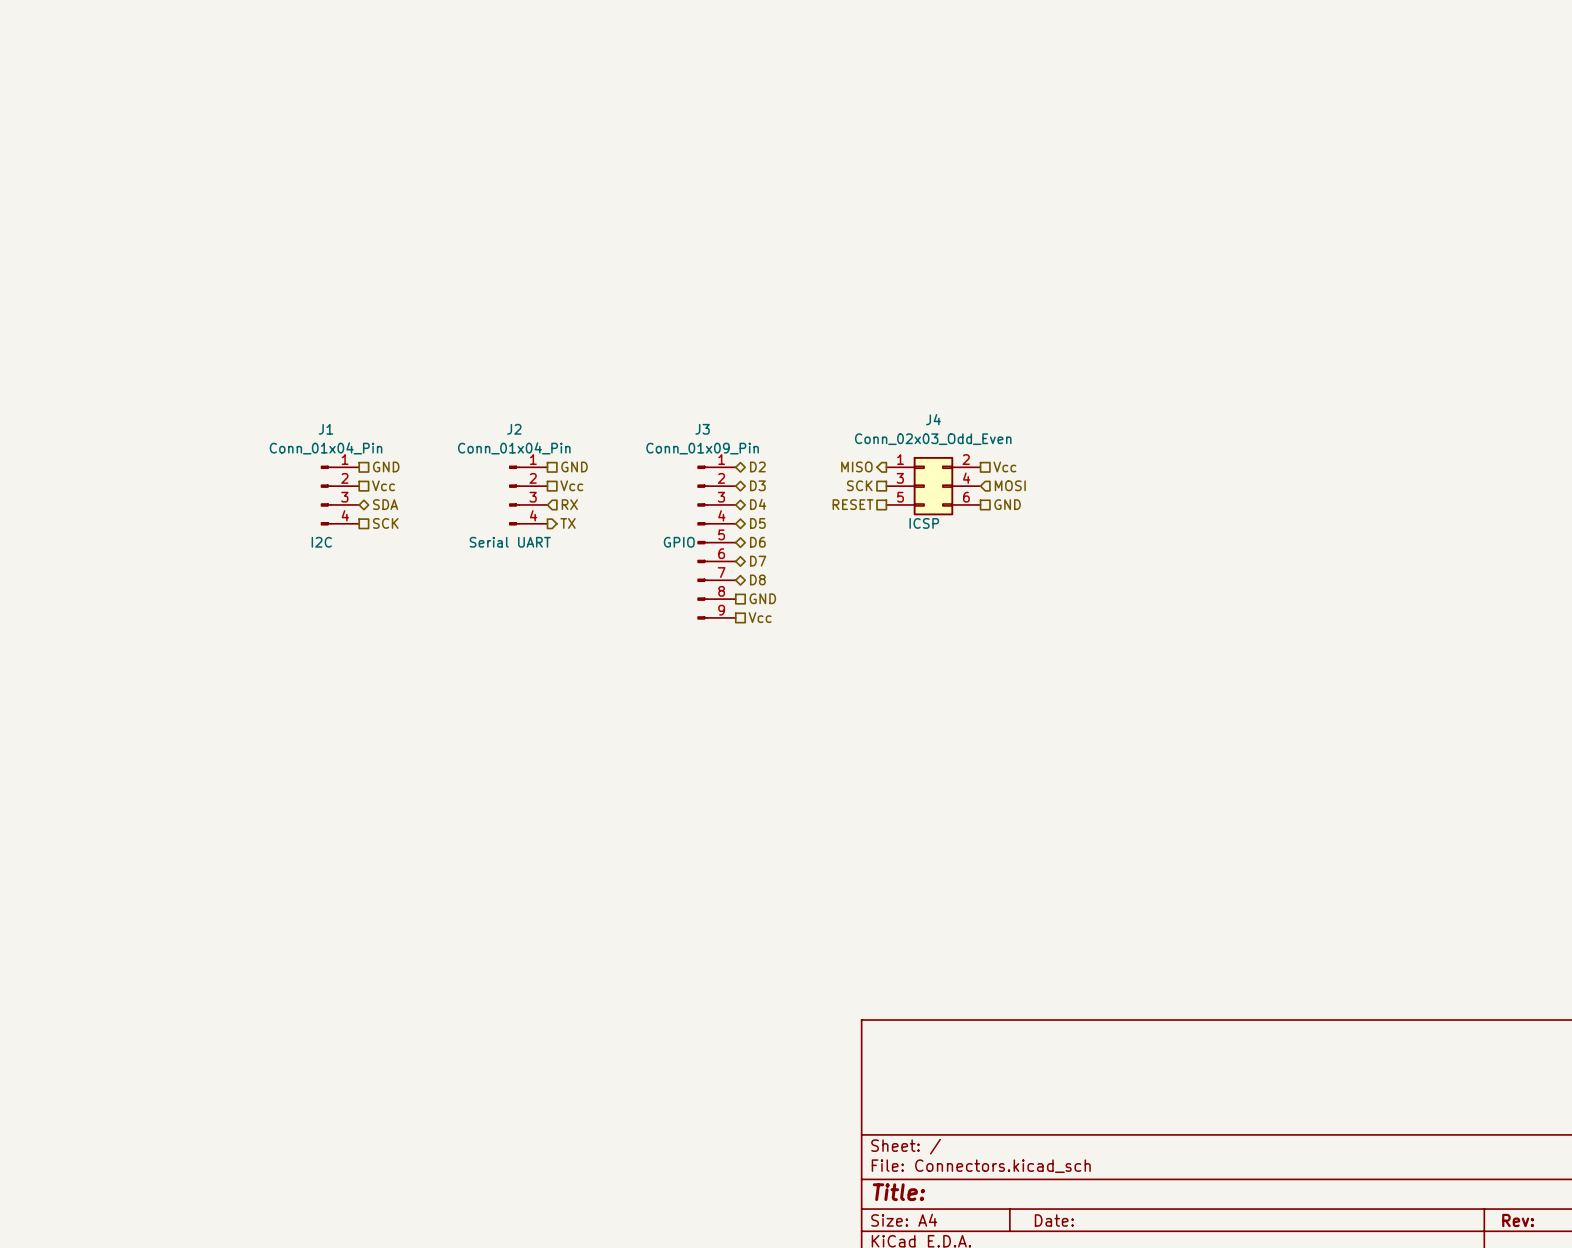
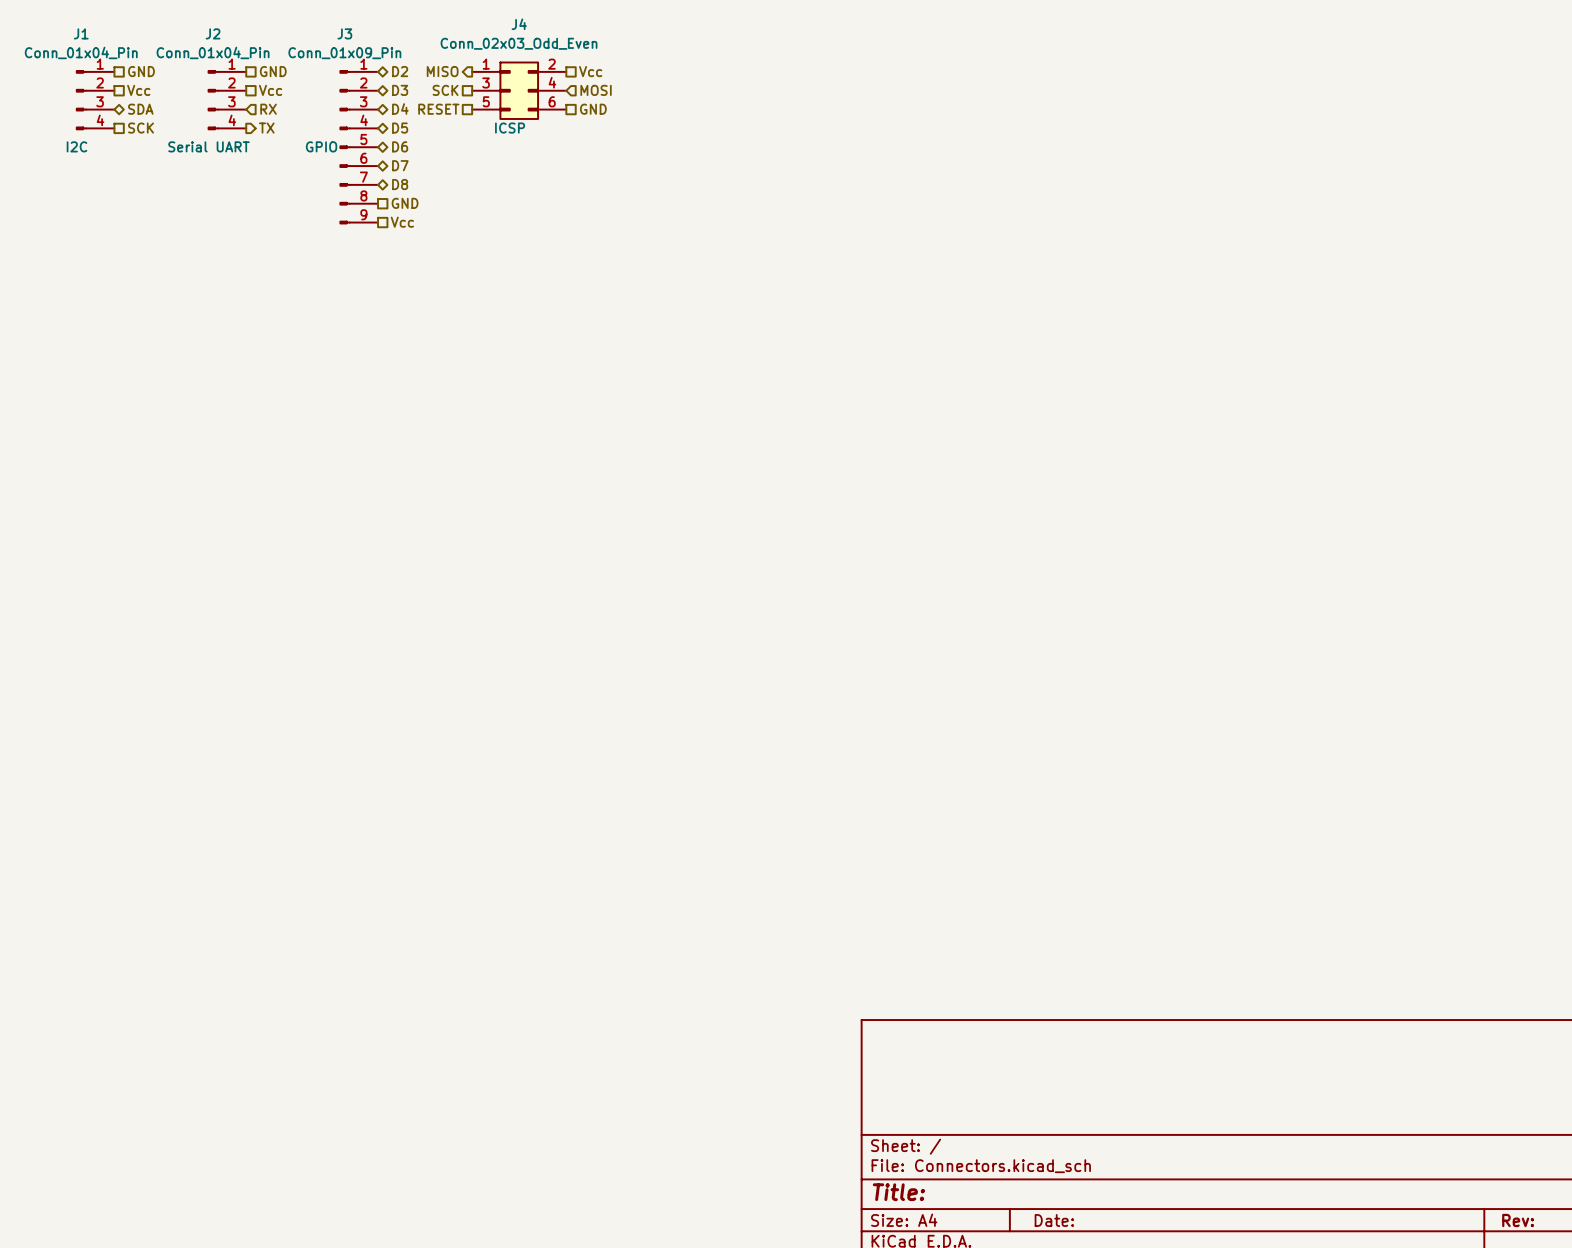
hierarchical label: none -> GND (141, 71)
hierarchical label: none -> GND (273, 71)
hierarchical label: none -> D2 (400, 71)
hierarchical label: none -> MISO (442, 71)
hierarchical label: none -> Vcc (590, 71)
hierarchical label: none -> Vcc (138, 90)
hierarchical label: none -> Vcc (270, 90)
hierarchical label: none -> D3 (400, 90)
hierarchical label: none -> SCK (445, 90)
hierarchical label: none -> MOSI (596, 90)
hierarchical label: none -> D4 (400, 108)
hierarchical label: none -> SDA (140, 109)
hierarchical label: none -> RX (268, 109)
hierarchical label: none -> RESET (438, 109)
hierarchical label: none -> GND (593, 109)
hierarchical label: none -> SCK (141, 128)
hierarchical label: none -> TX (266, 128)
hierarchical label: none -> D5 (400, 128)
hierarchical label: none -> D6 (400, 146)
hierarchical label: none -> D7 (400, 165)
hierarchical label: none -> D8 (400, 184)
hierarchical label: none -> GND (405, 203)
hierarchical label: none -> Vcc (402, 222)
hierarchical label: GND (386, 466) -> none
hierarchical label: GND (574, 466) -> none
hierarchical label: D2 (757, 466) -> none
hierarchical label: MISO (856, 466) -> none
hierarchical label: Vcc (1004, 466) -> none
hierarchical label: Vcc (383, 485) -> none
hierarchical label: Vcc (571, 485) -> none
hierarchical label: D3 (757, 485) -> none
hierarchical label: SCK (859, 485) -> none
hierarchical label: MOSI (1010, 485) -> none
J4 position: (933, 486) -> (519, 90)
J1 position: (340, 495) -> (95, 100)
J2 position: (528, 495) -> (227, 100)
hierarchical label: SDA (385, 504) -> none
hierarchical label: RX (569, 504) -> none
hierarchical label: D4 (758, 504) -> none
hierarchical label: RESET (853, 504) -> none
hierarchical label: GND (1007, 504) -> none
hierarchical label: SCK (385, 523) -> none
hierarchical label: TX (568, 523) -> none
hierarchical label: D5 (757, 523) -> none
J3 position: (716, 542) -> (358, 147)
hierarchical label: D6 (757, 542) -> none
hierarchical label: D7 (758, 561) -> none
hierarchical label: D8 (757, 579) -> none
hierarchical label: GND (762, 598) -> none
hierarchical label: Vcc (760, 617) -> none

